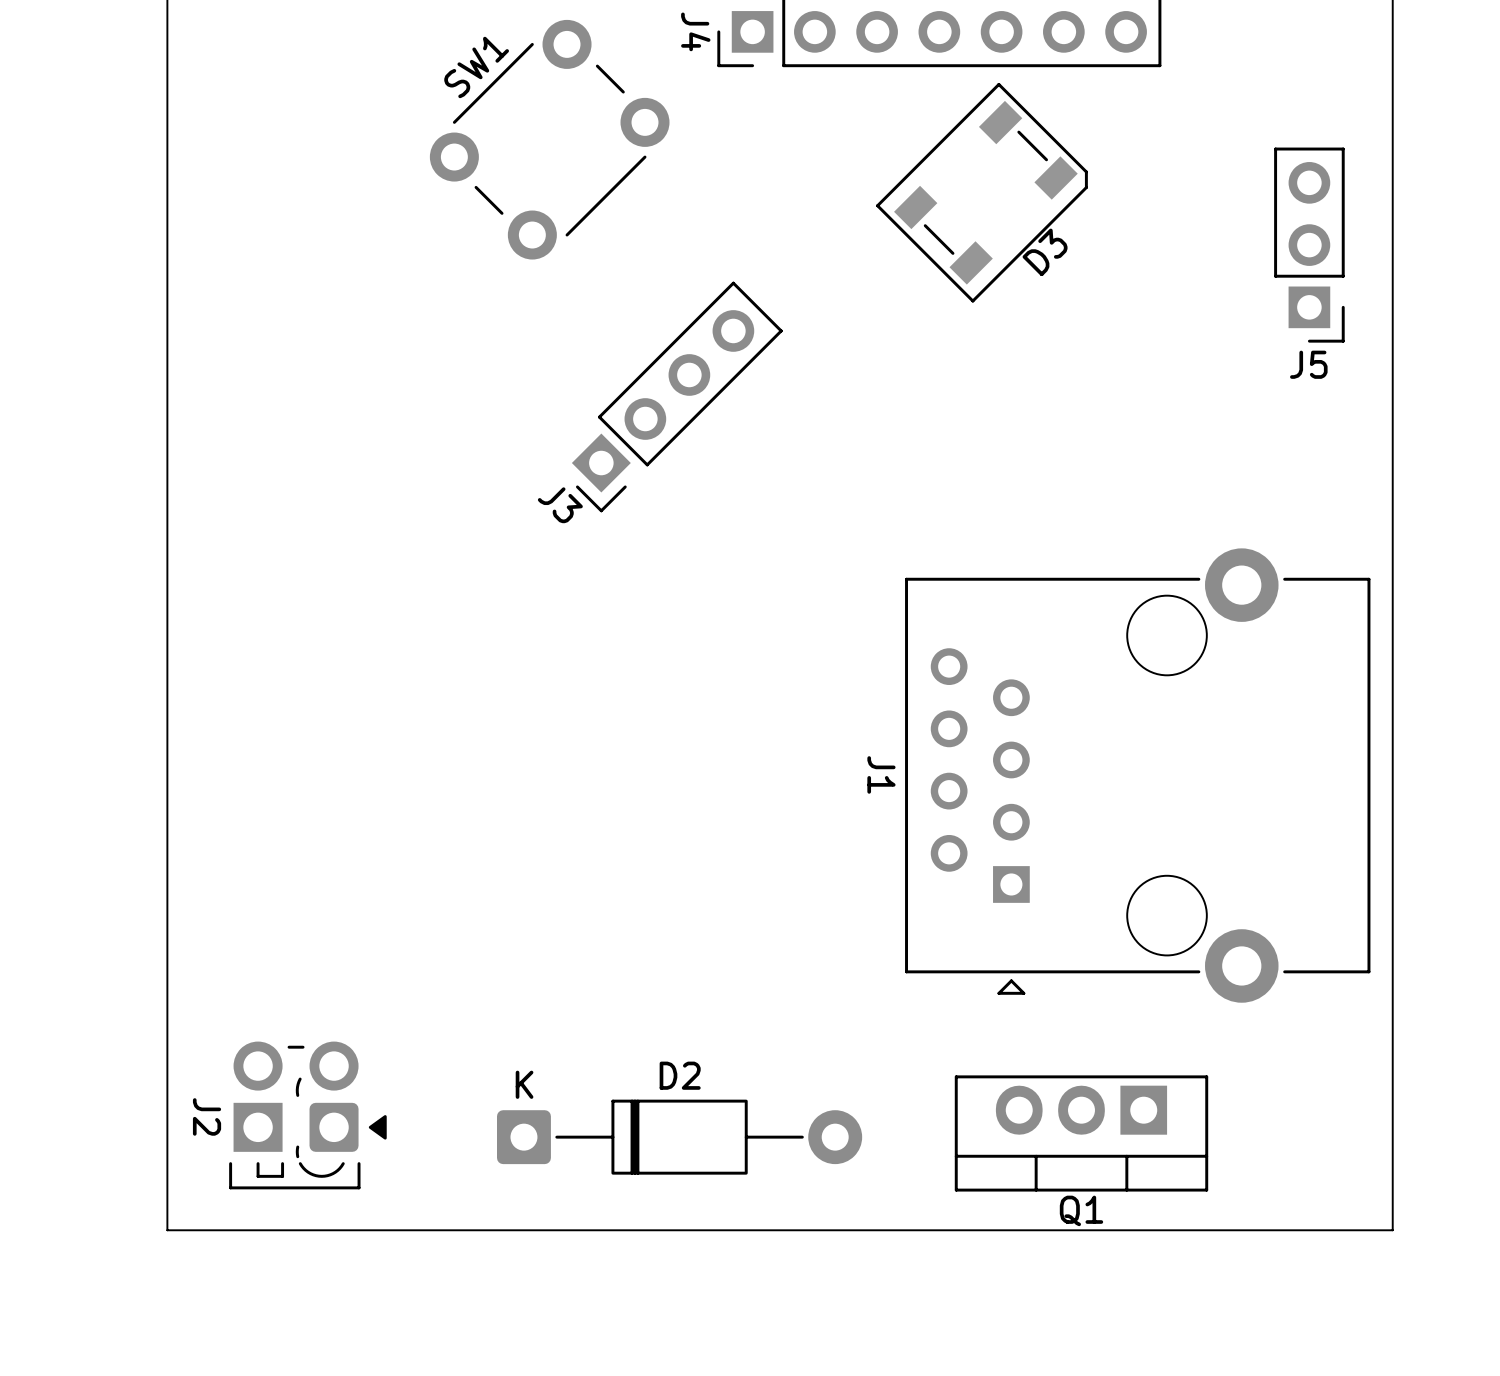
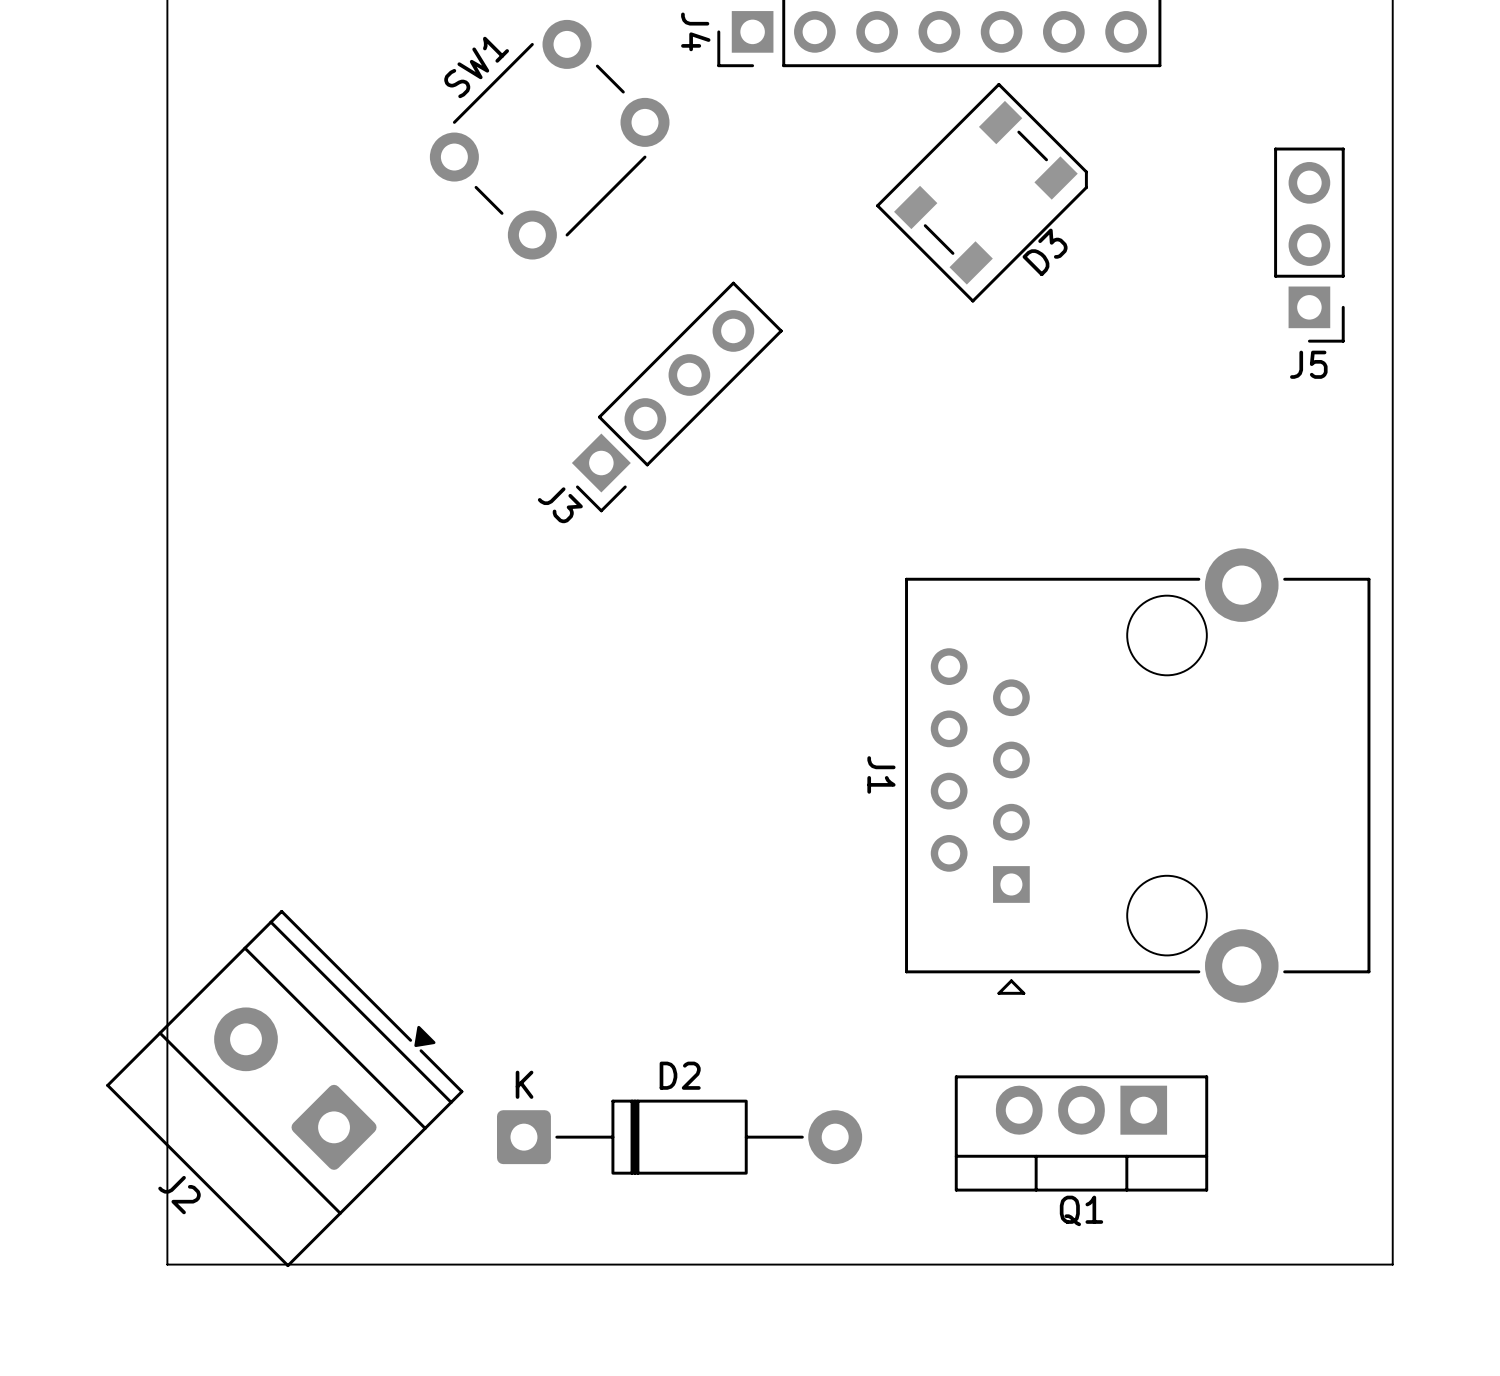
J2 footprint: [229, 1041, 387, 1190] -> [106, 909, 464, 1268]
J2 name position: J2 (207, 1116) -> J2 (179, 1195)
board edge: (1392, 1230) (167, 1230) -> (1392, 1230) (1392, 1264) (167, 1264) (167, 1230)

